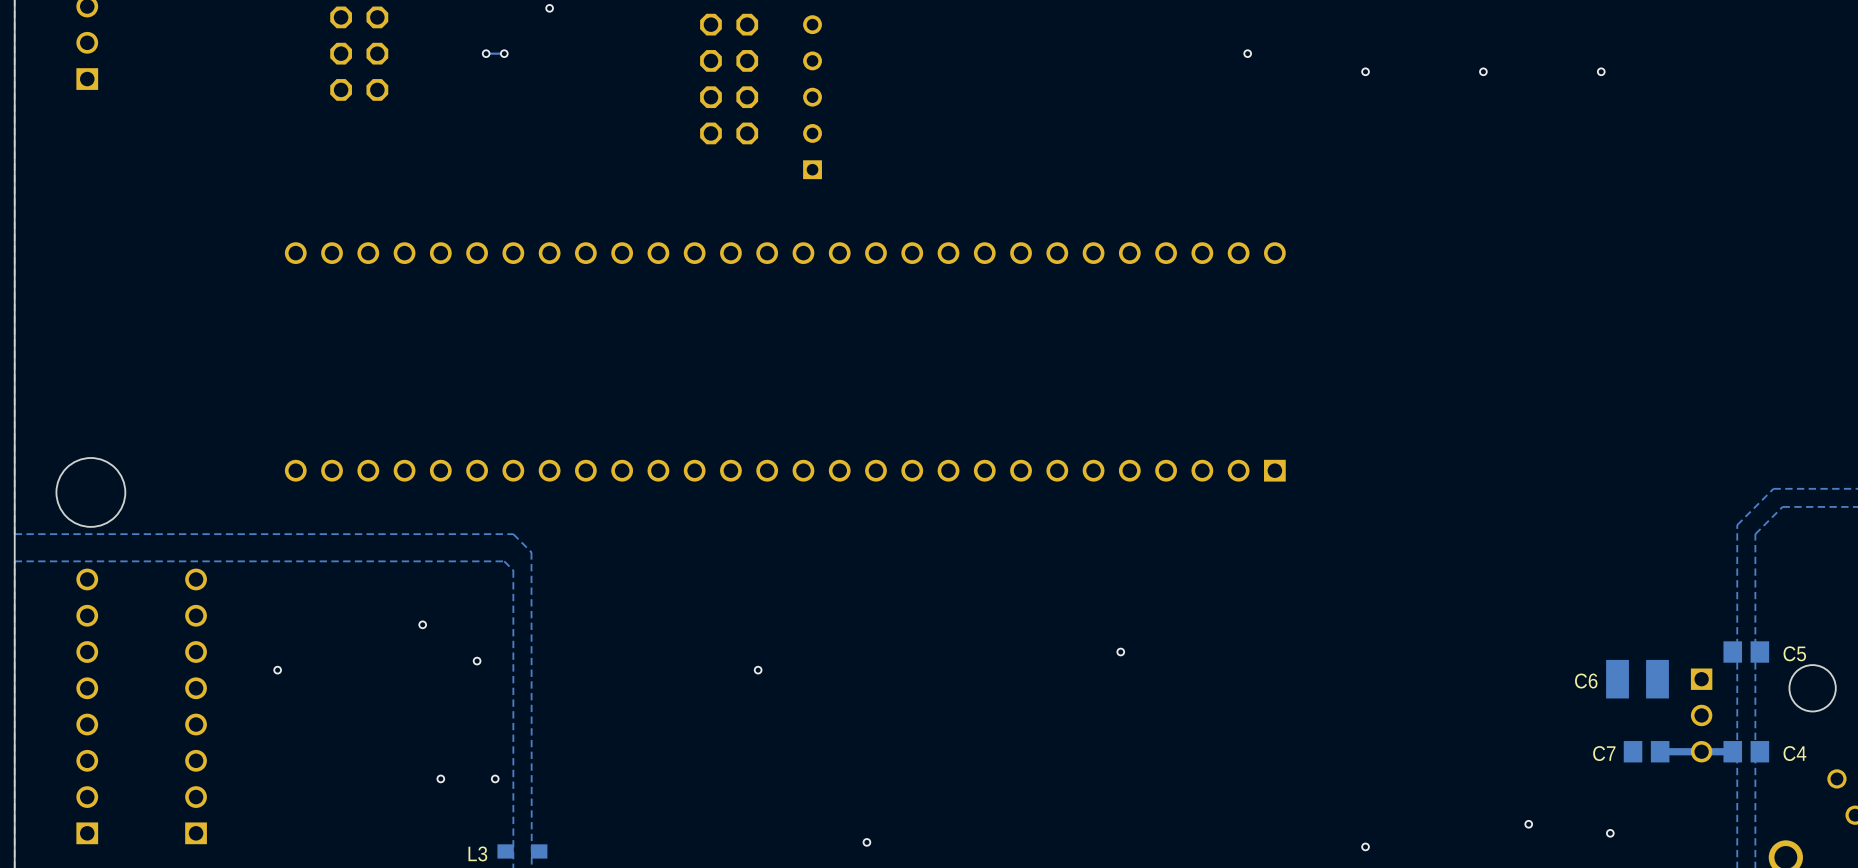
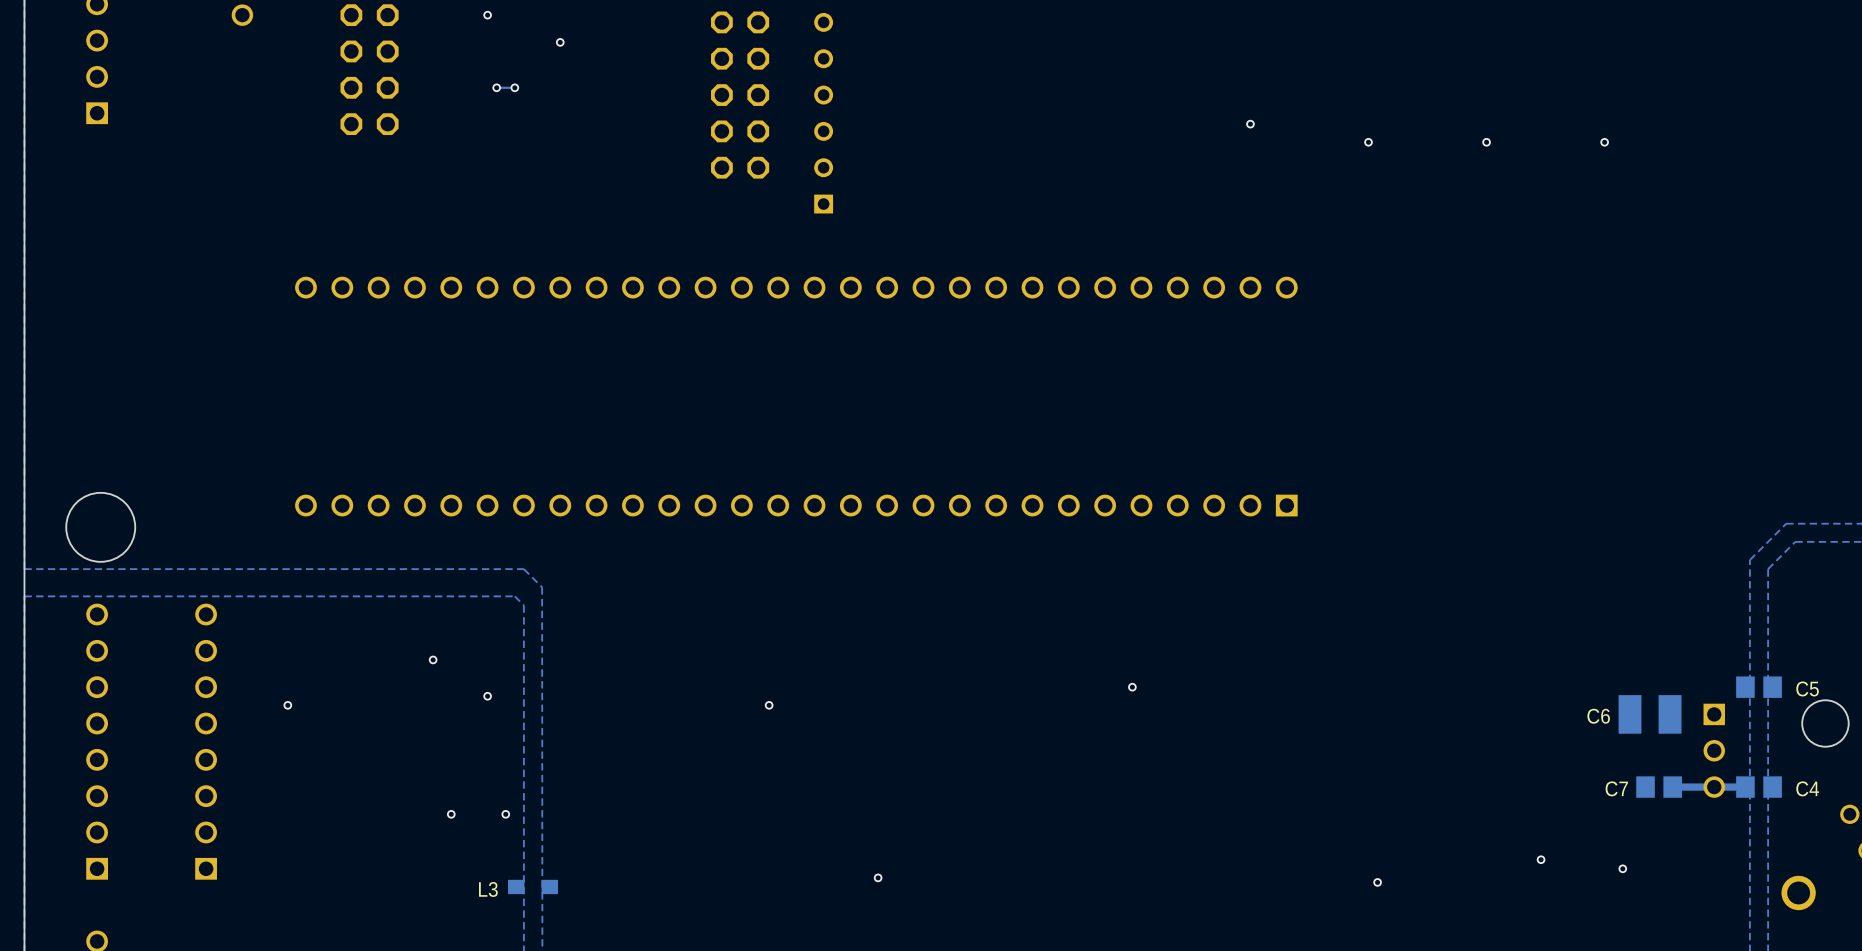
via position: (1247, 53) -> (1250, 124)
via position: (1365, 71) -> (1368, 142)
via position: (1483, 71) -> (1486, 142)
via position: (1601, 71) -> (1604, 142)

